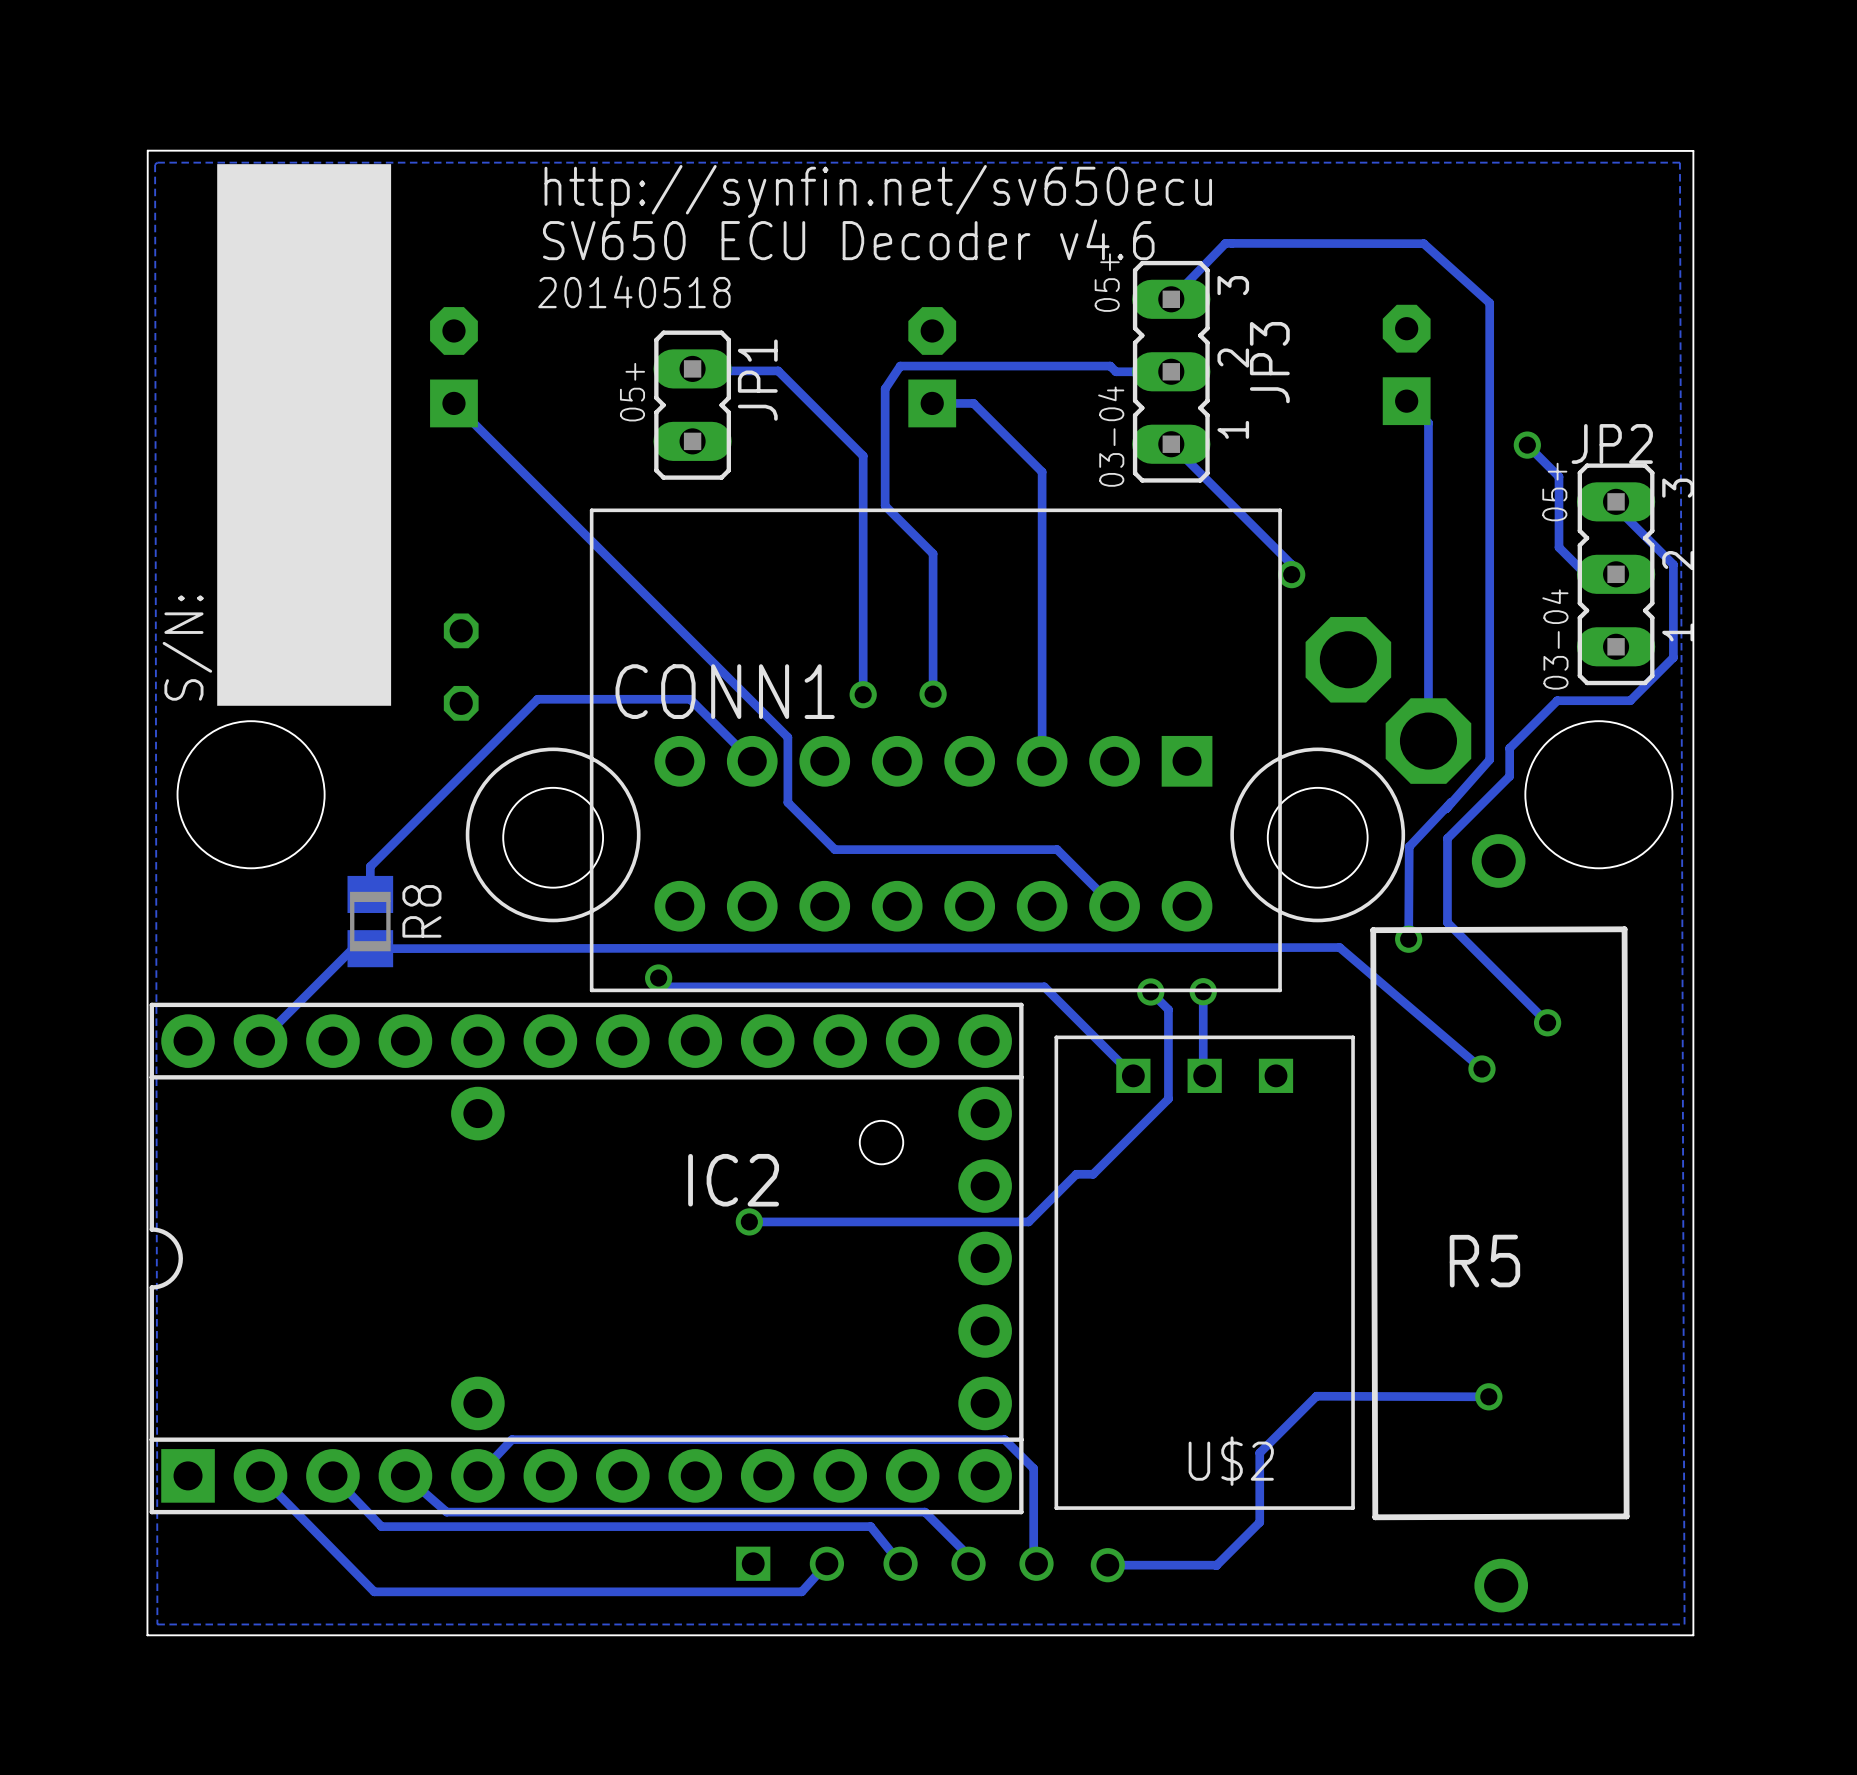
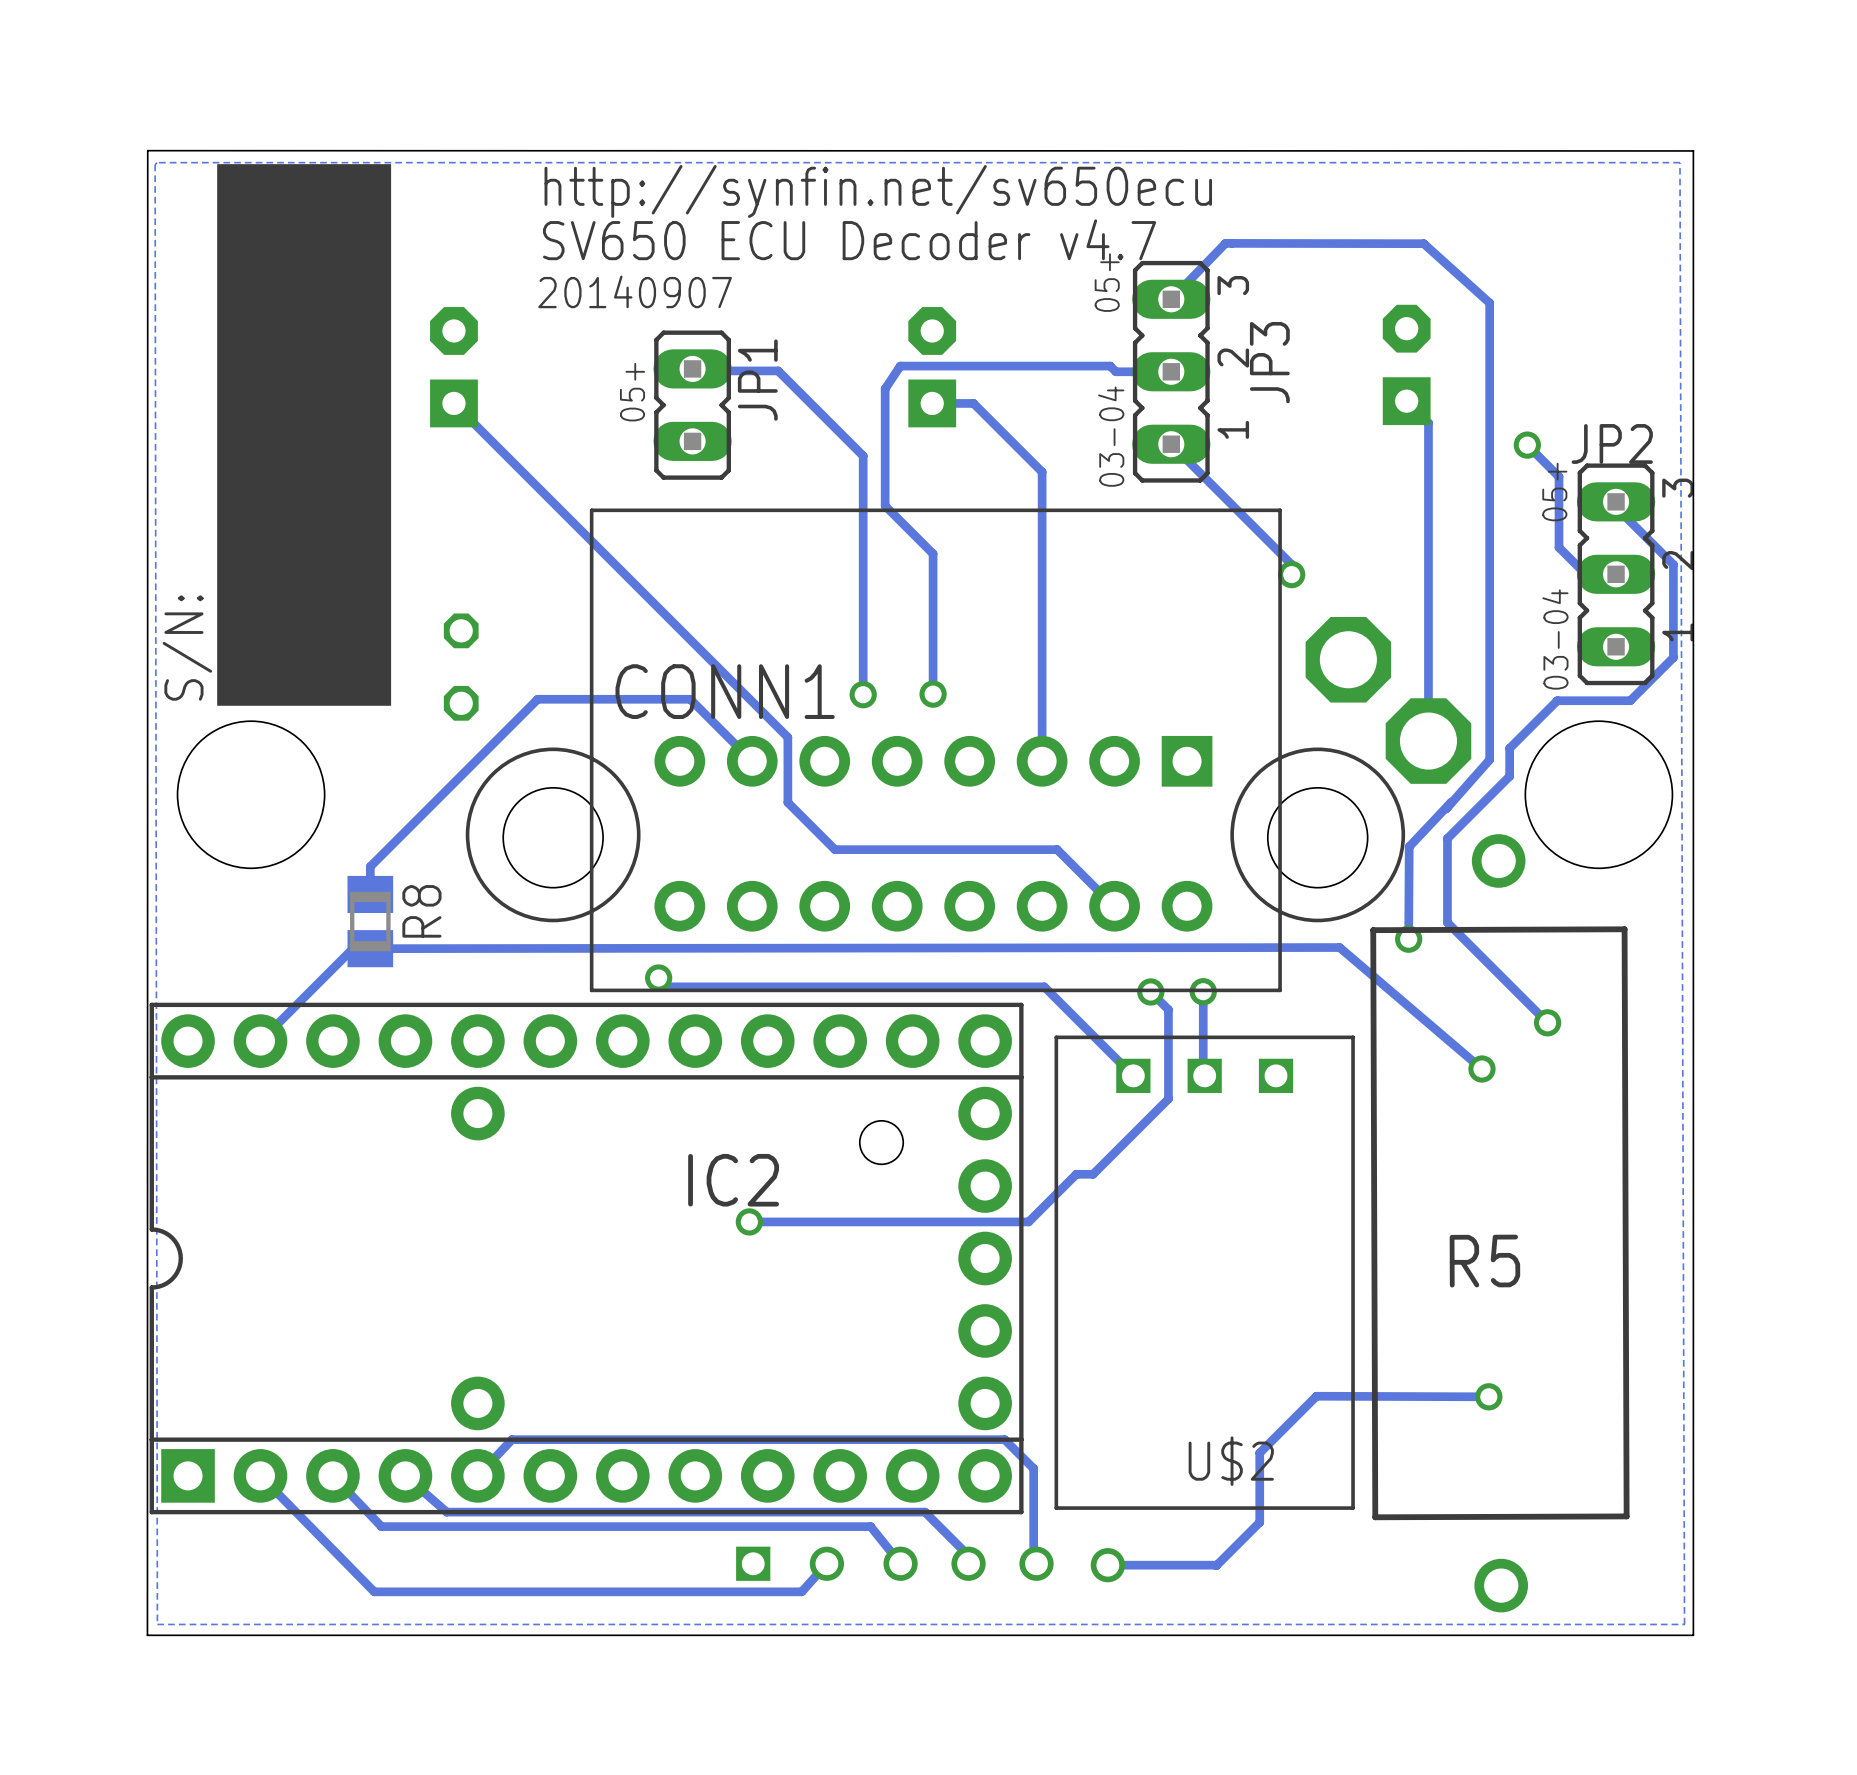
text: SV650 ECU Decoder v4.6 (848, 239) -> SV650 ECU Decoder v4.7 (849, 239)
text: 20140518 (634, 291) -> 20140907 (635, 291)

